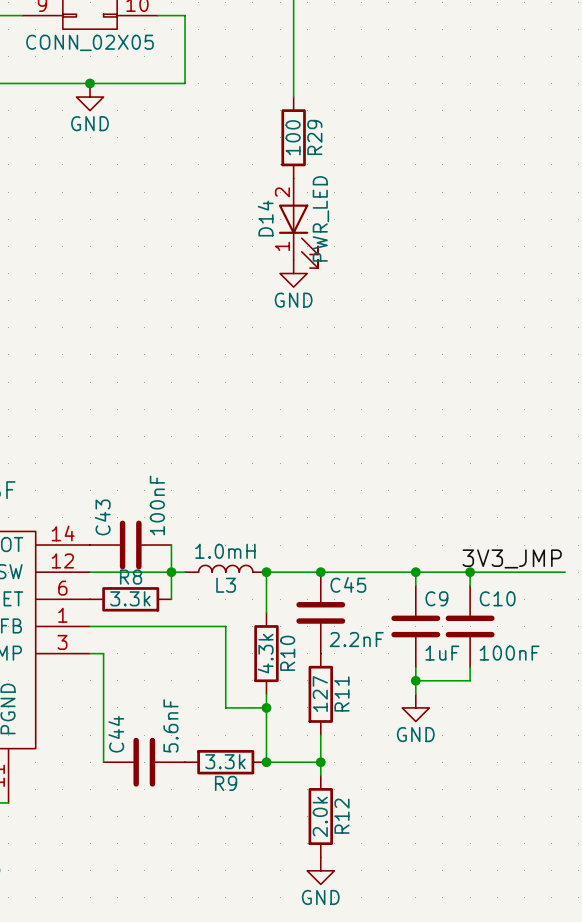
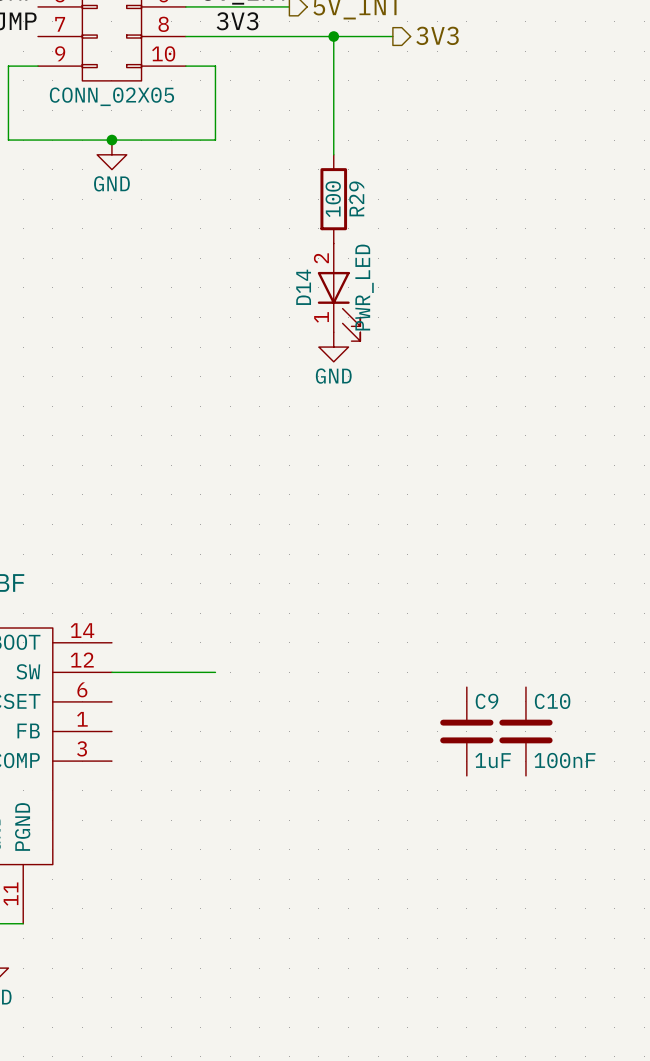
C43: 100nF (130, 545) -> none
wire: (171, 545) (171, 599) -> none
label: 3V3_JMP (512, 558) -> none
L3: 1.0mH (225, 568) -> none
junction: (171, 572) -> none
junction: (266, 572) -> none
junction: (320, 572) -> none
wire: (415, 572) (415, 585) -> none
junction: (415, 572) -> none
wire: (470, 572) (470, 585) -> none
junction: (470, 572) -> none
wire: (565, 572) (266, 572) (266, 612) -> none
R8: 3.3k (130, 599) -> none
C45: 2.2nF (320, 612) -> none
wire: (90, 626) (225, 626) (225, 707) (266, 707) -> none
wire: (90, 653) (103, 653) (103, 762) -> none
R10: 4.3k (266, 653) -> none
wire: (415, 667) (415, 694) -> none
wire: (470, 667) (470, 680) (415, 680) -> none
junction: (415, 680) -> none
wire: (266, 694) (266, 762) (320, 762) -> none
R11: 127 (320, 694) -> none
junction: (266, 707) -> none
power symbol: GND (415, 707) -> none
wire: (320, 735) (320, 775) -> none
C44: 5.6nF (144, 762) -> none
R9: 3.3k (225, 762) -> none
junction: (266, 762) -> none
junction: (320, 762) -> none
R12: 2.0k (320, 816) -> none
power symbol: GND (320, 870) -> none

